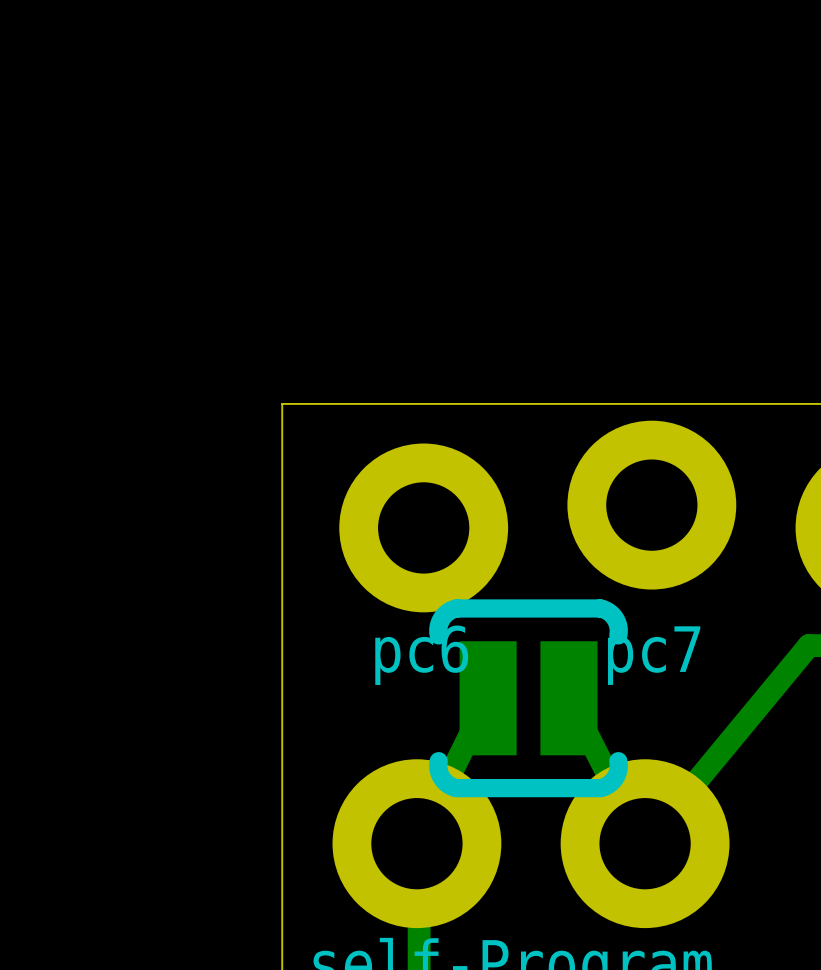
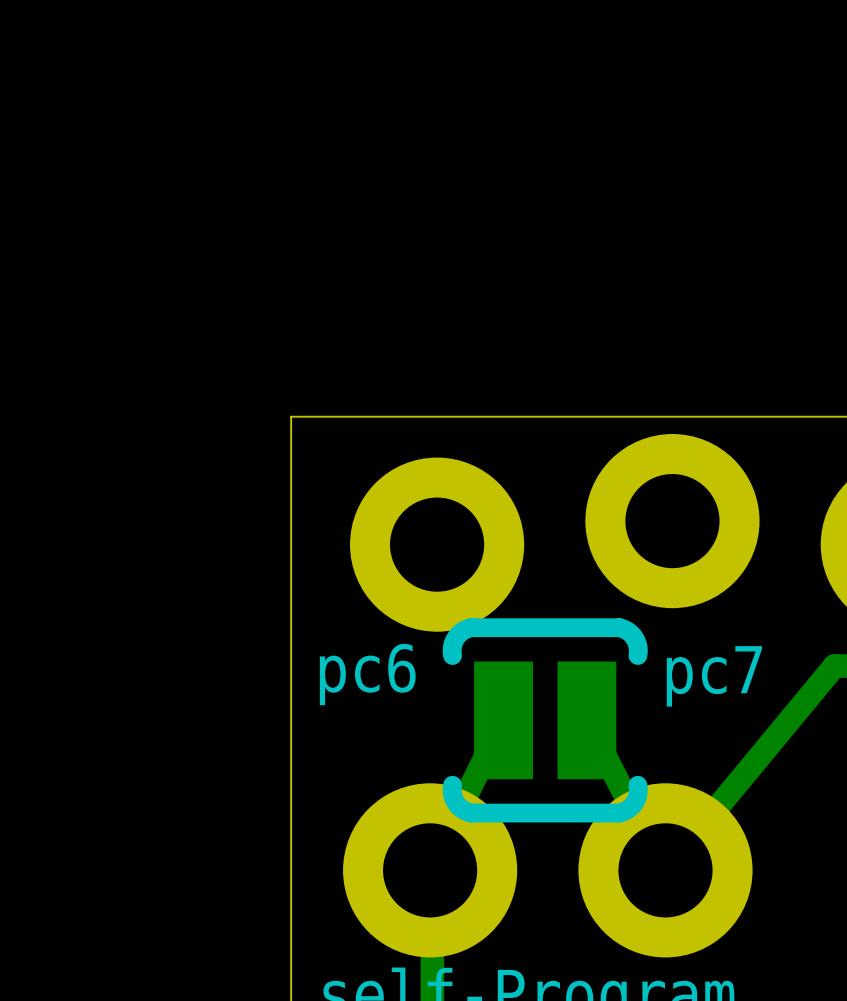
text position: pc6 (421, 655) -> pc6 (367, 674)
text position: pc7 (654, 655) -> pc7 (714, 676)

